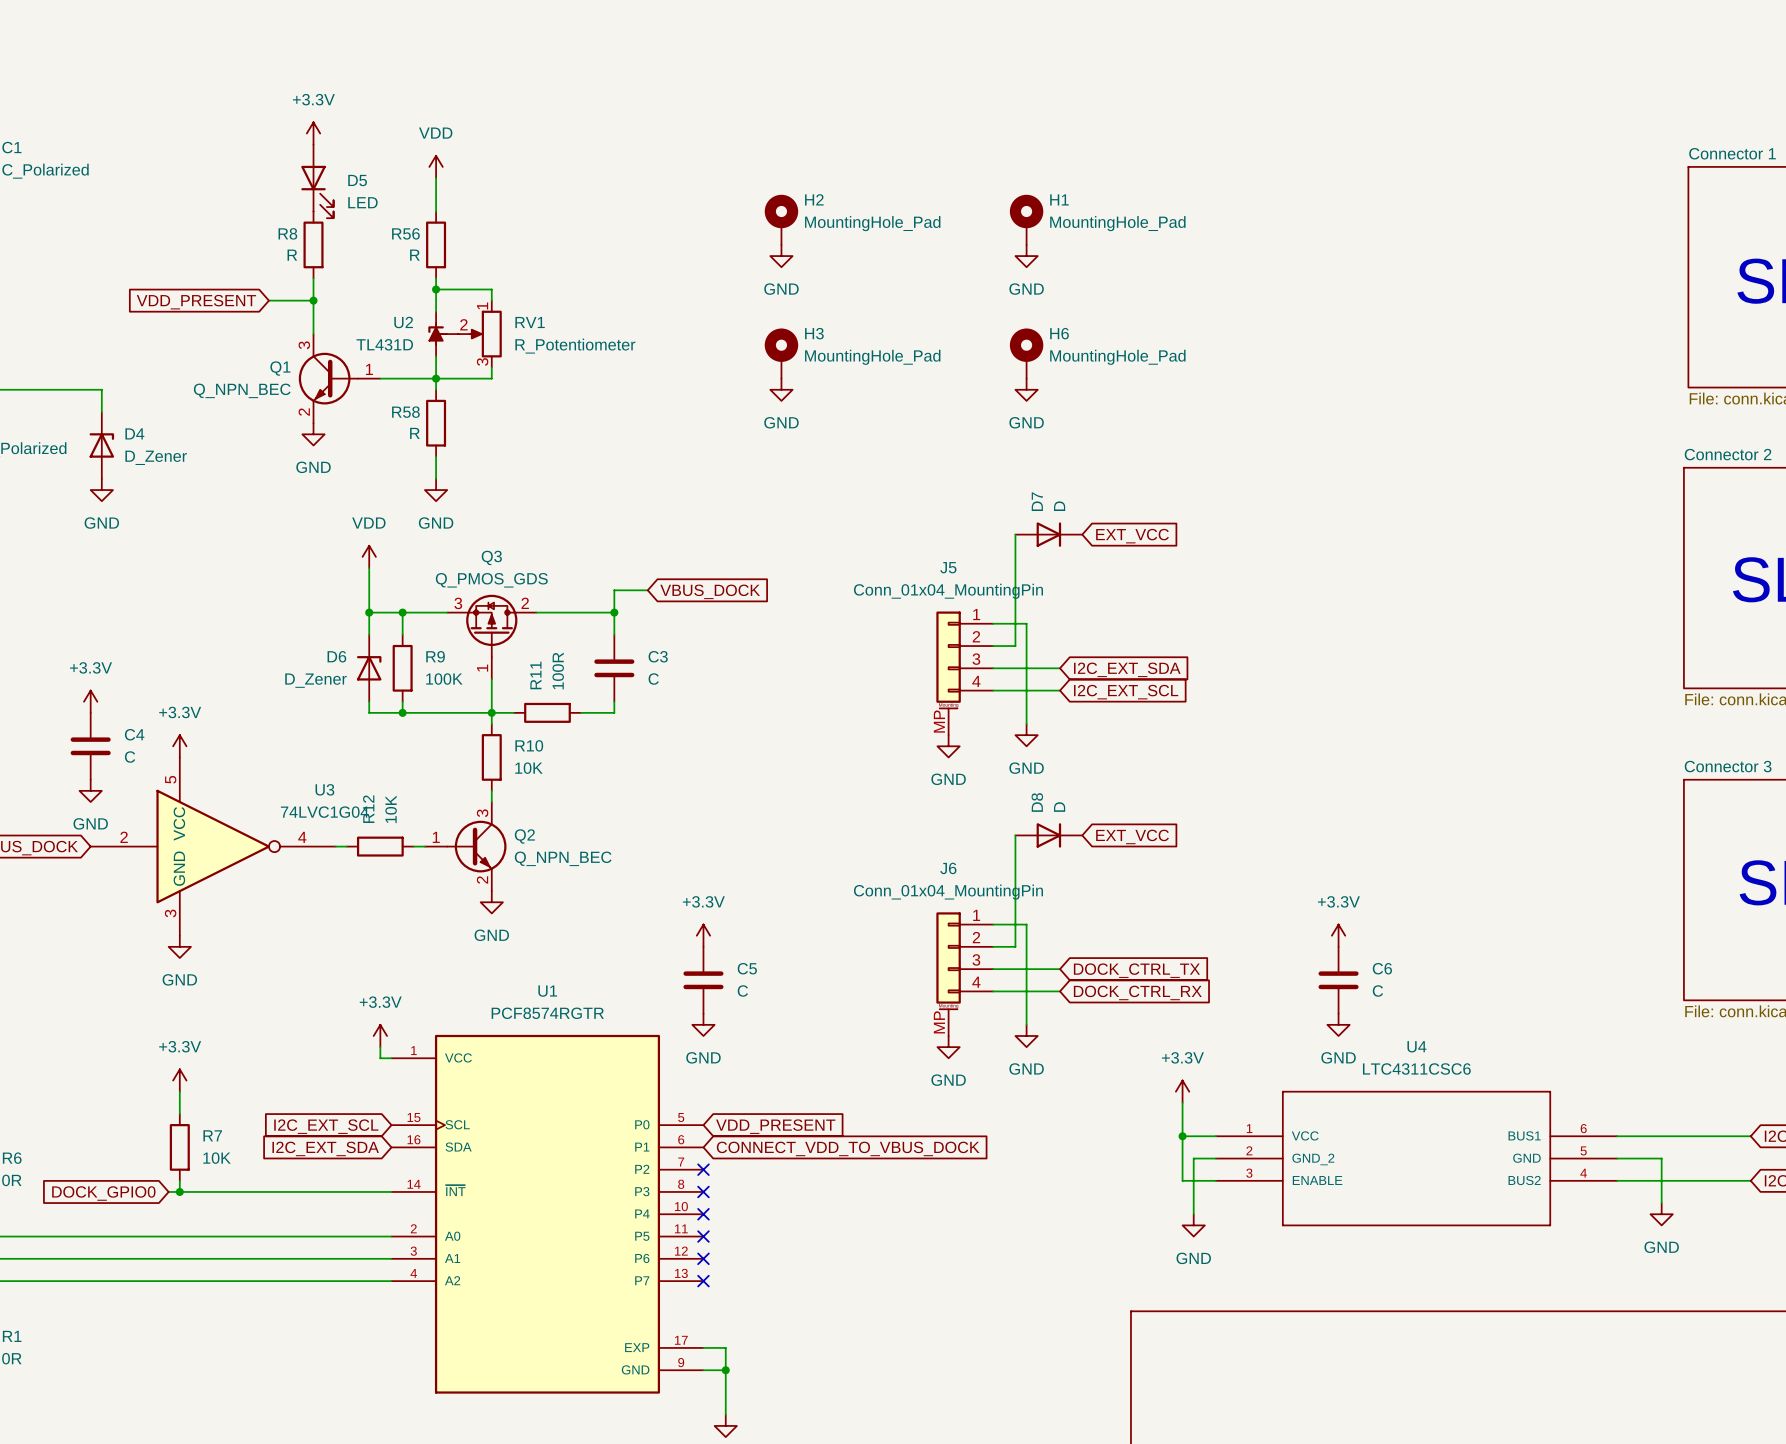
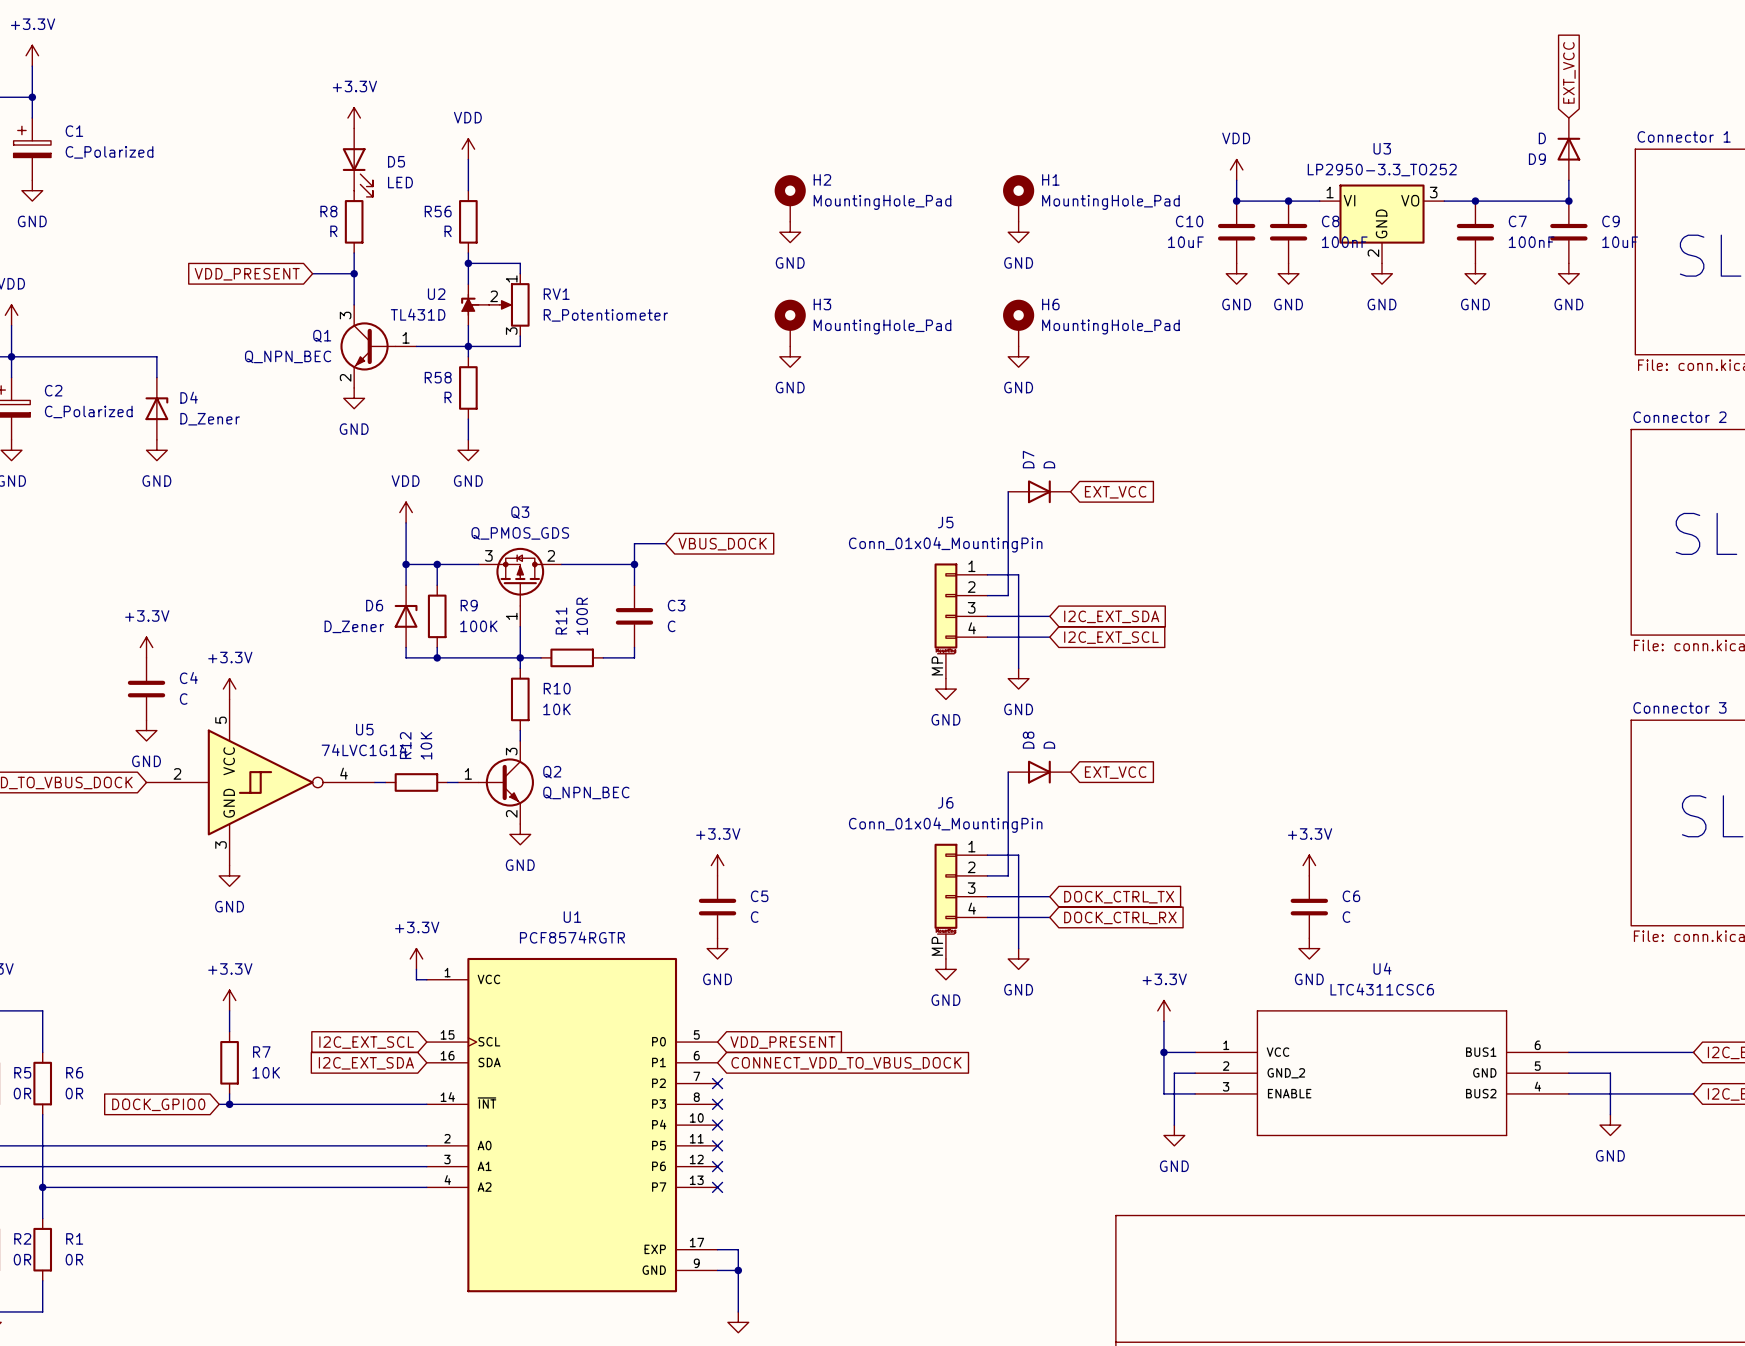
global label: none -> EXT_VCC (1569, 72)
D9: none -> D (1568, 149)
power symbol: none -> VDD (1236, 169)
wire: none -> (1236, 180) (1236, 201) (1319, 201)
wire: none -> (1568, 180) (1568, 201) (1444, 201)
junction: none -> (1236, 201)
junction: none -> (1288, 201)
junction: none -> (1475, 201)
junction: none -> (1568, 201)
C10: none -> 10uF (1236, 232)
C8: none -> 100nF (1288, 232)
C7: none -> 100nF (1475, 232)
C9: none -> 10uF (1568, 232)
power symbol: none -> GND (1236, 273)
power symbol: none -> GND (1288, 273)
power symbol: none -> GND (1382, 273)
power symbol: none -> GND (1475, 273)
power symbol: none -> GND (1568, 273)
U3 symbol: [90, 757, 336, 936] -> [1319, 184, 1445, 264]
U3 name position: U3 (324, 789) -> U3 (1382, 148)
U3 value: 74LVC1G04 (324, 812) -> LP2950-3.3_TO252 (1382, 170)
U5: none -> 74LVC1G14 (260, 782)

